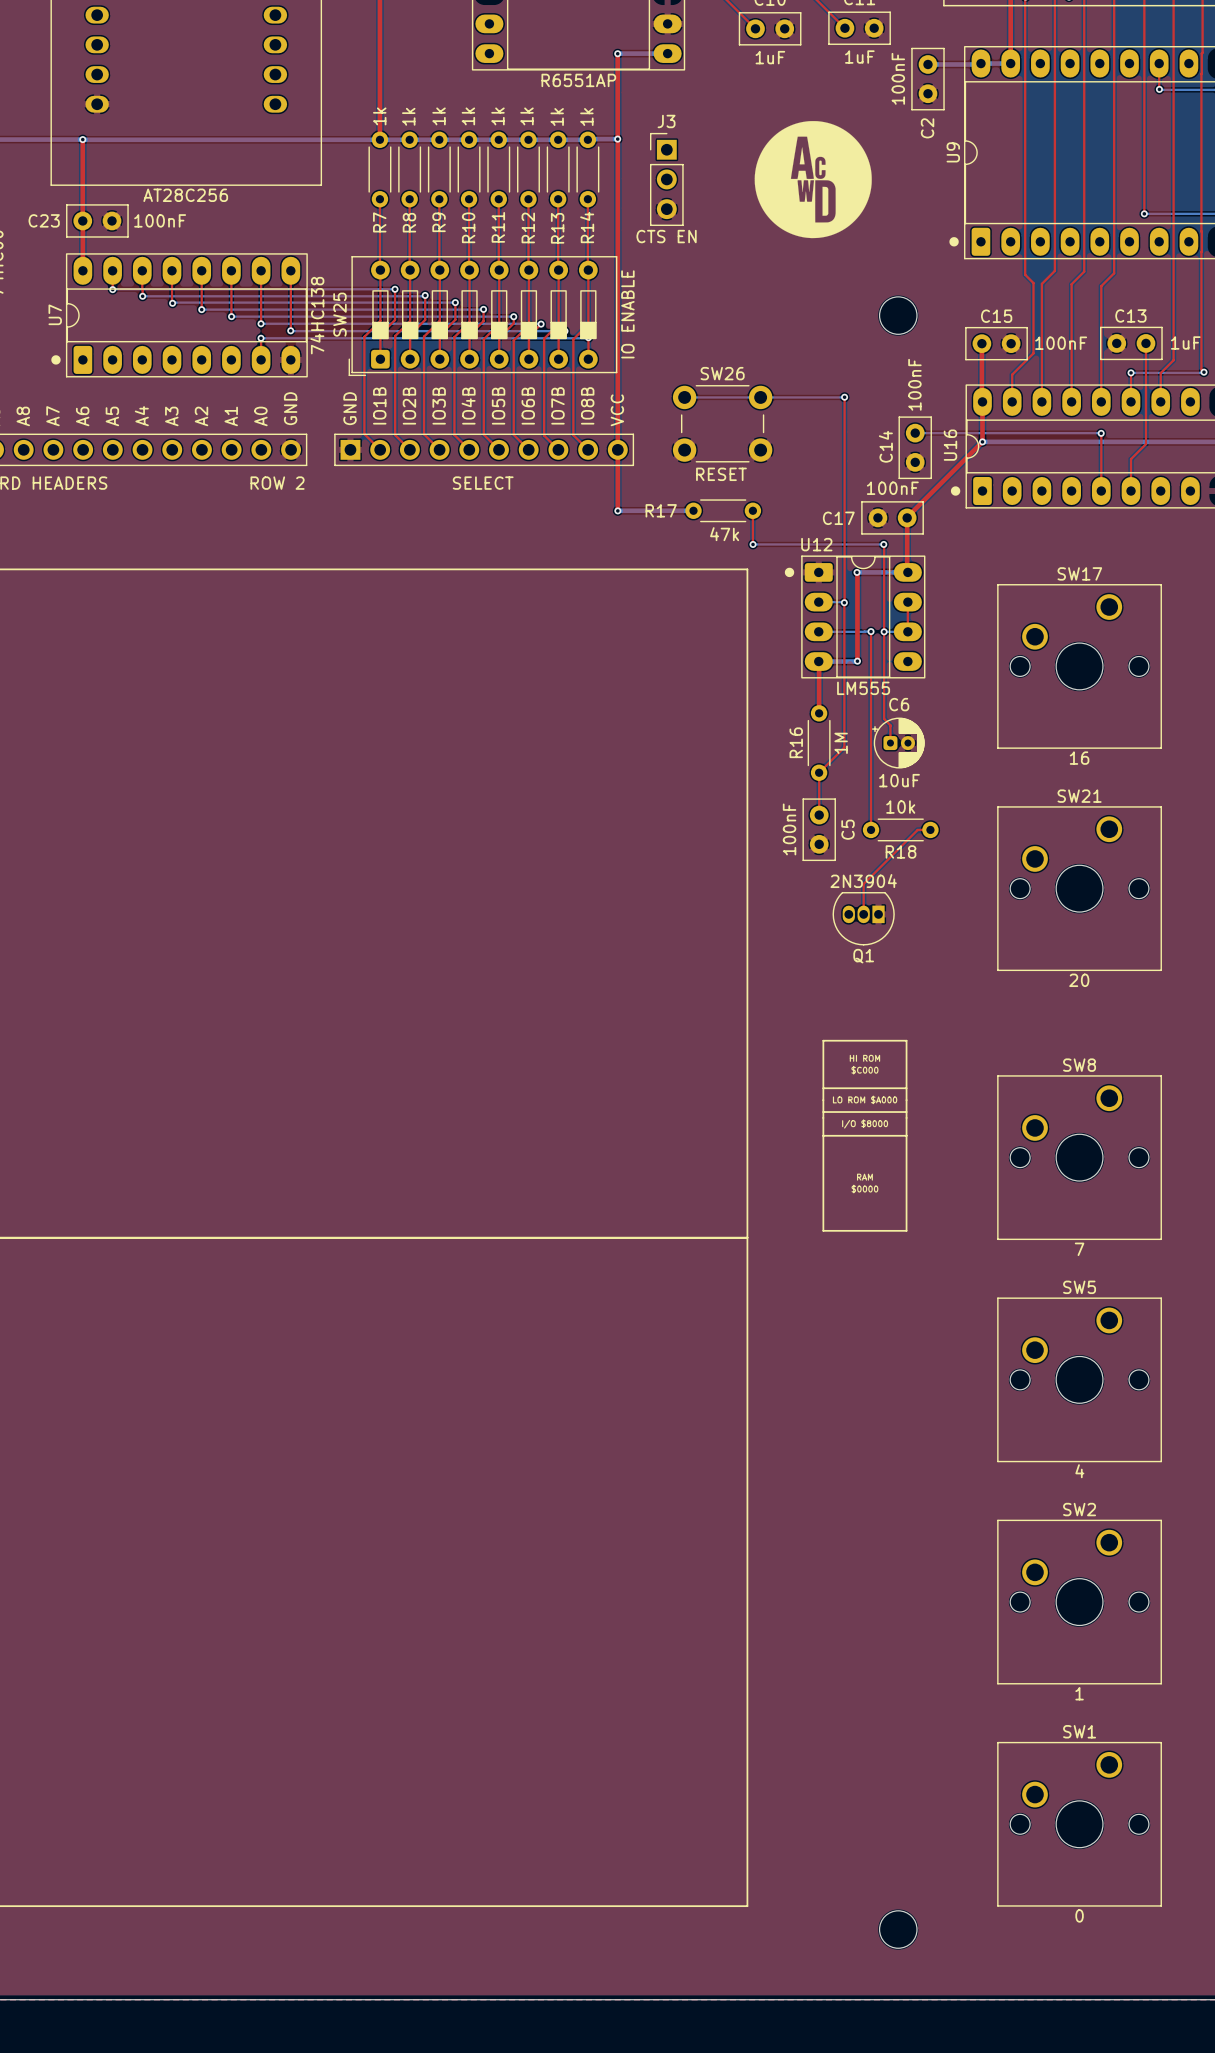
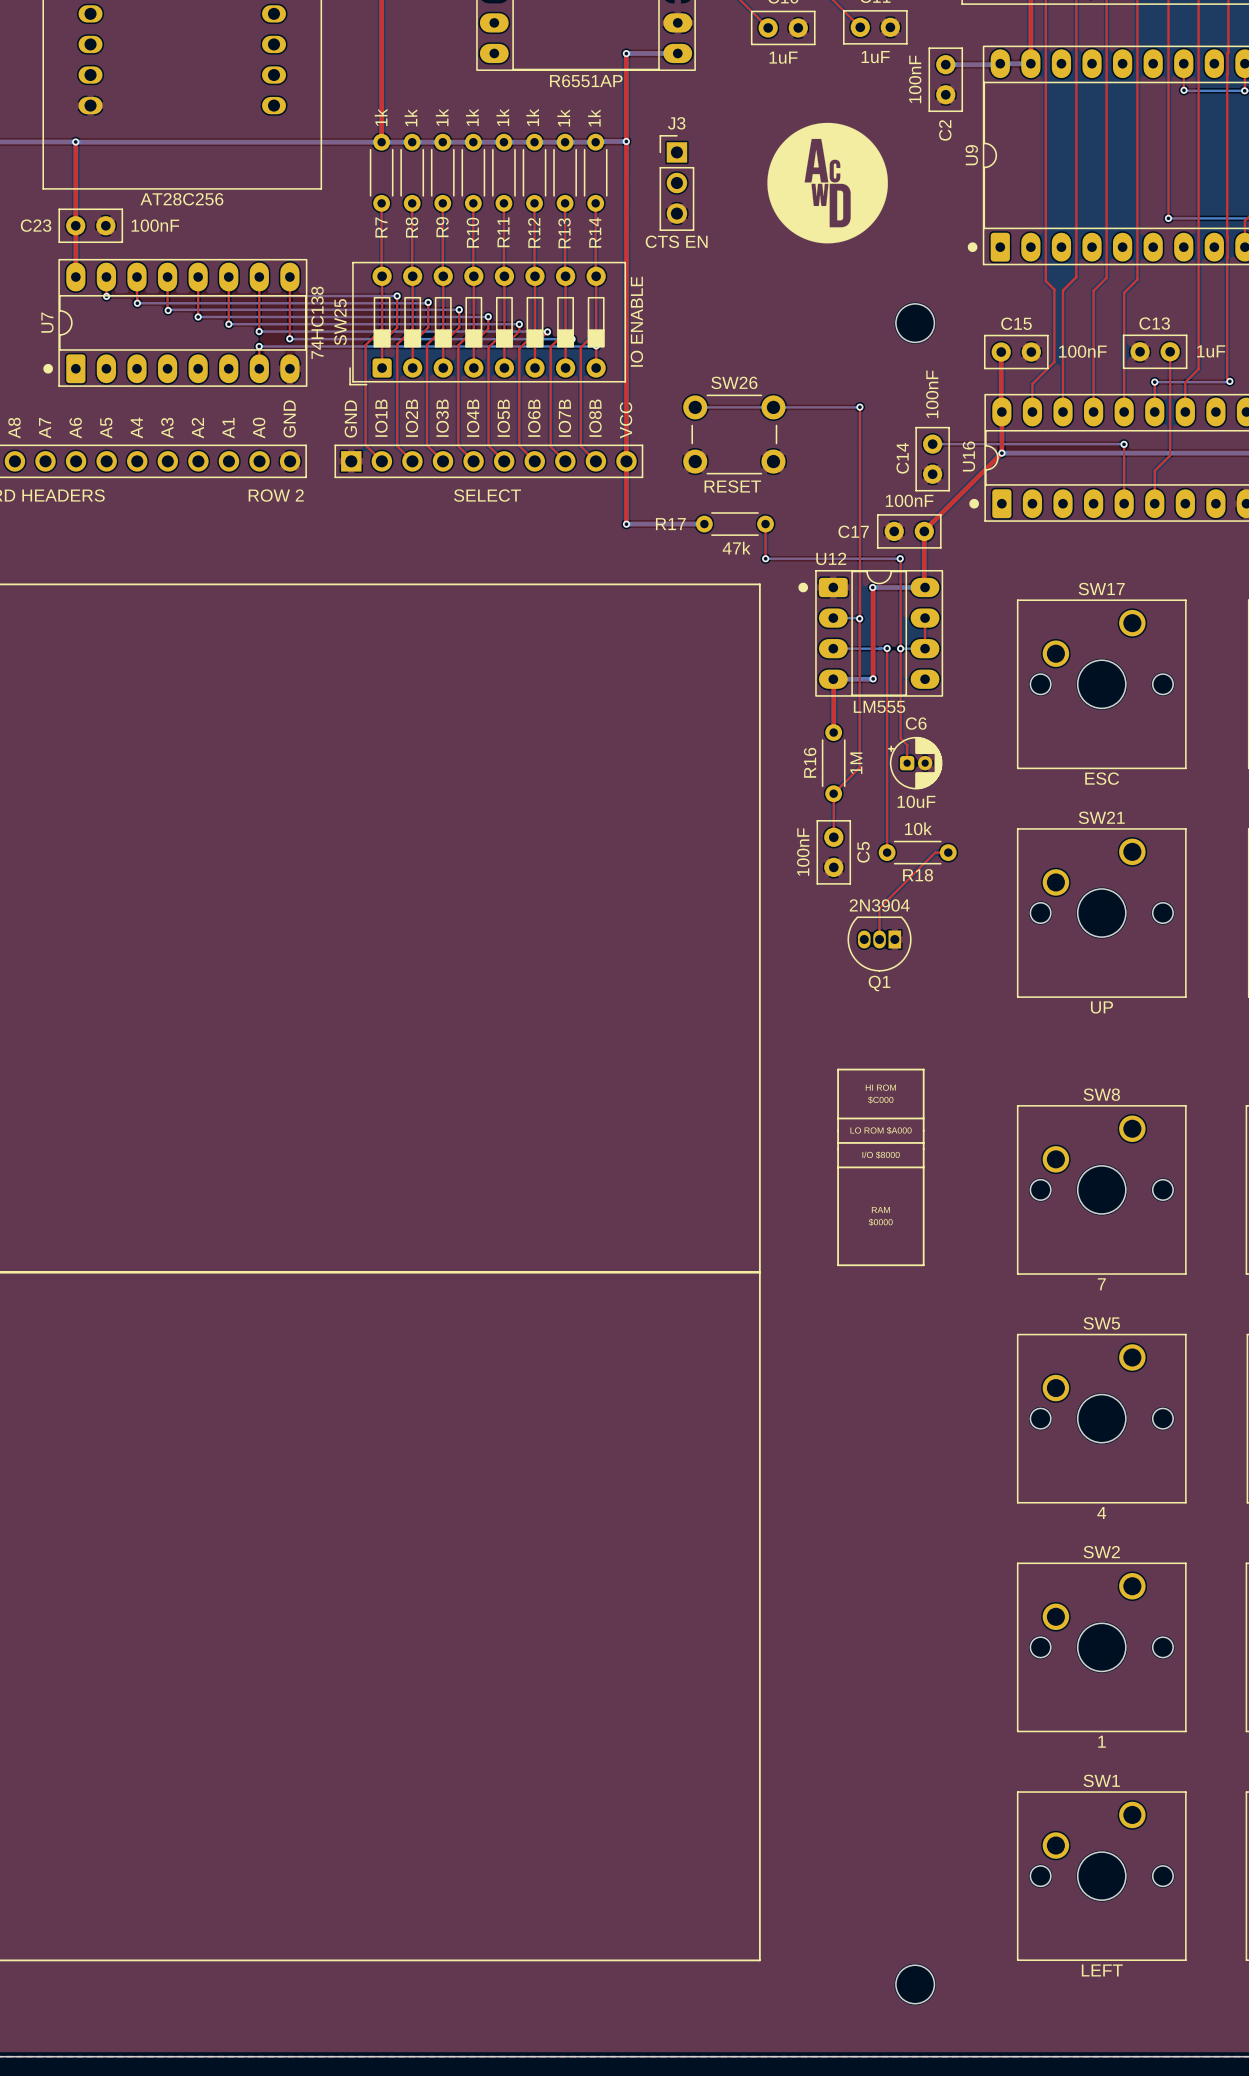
SW17 value: 16 (1079, 758) -> ESC (1102, 778)
SW21 value: 20 (1079, 980) -> UP (1101, 1007)
SW1 value: 0 (1079, 1915) -> LEFT (1102, 1970)

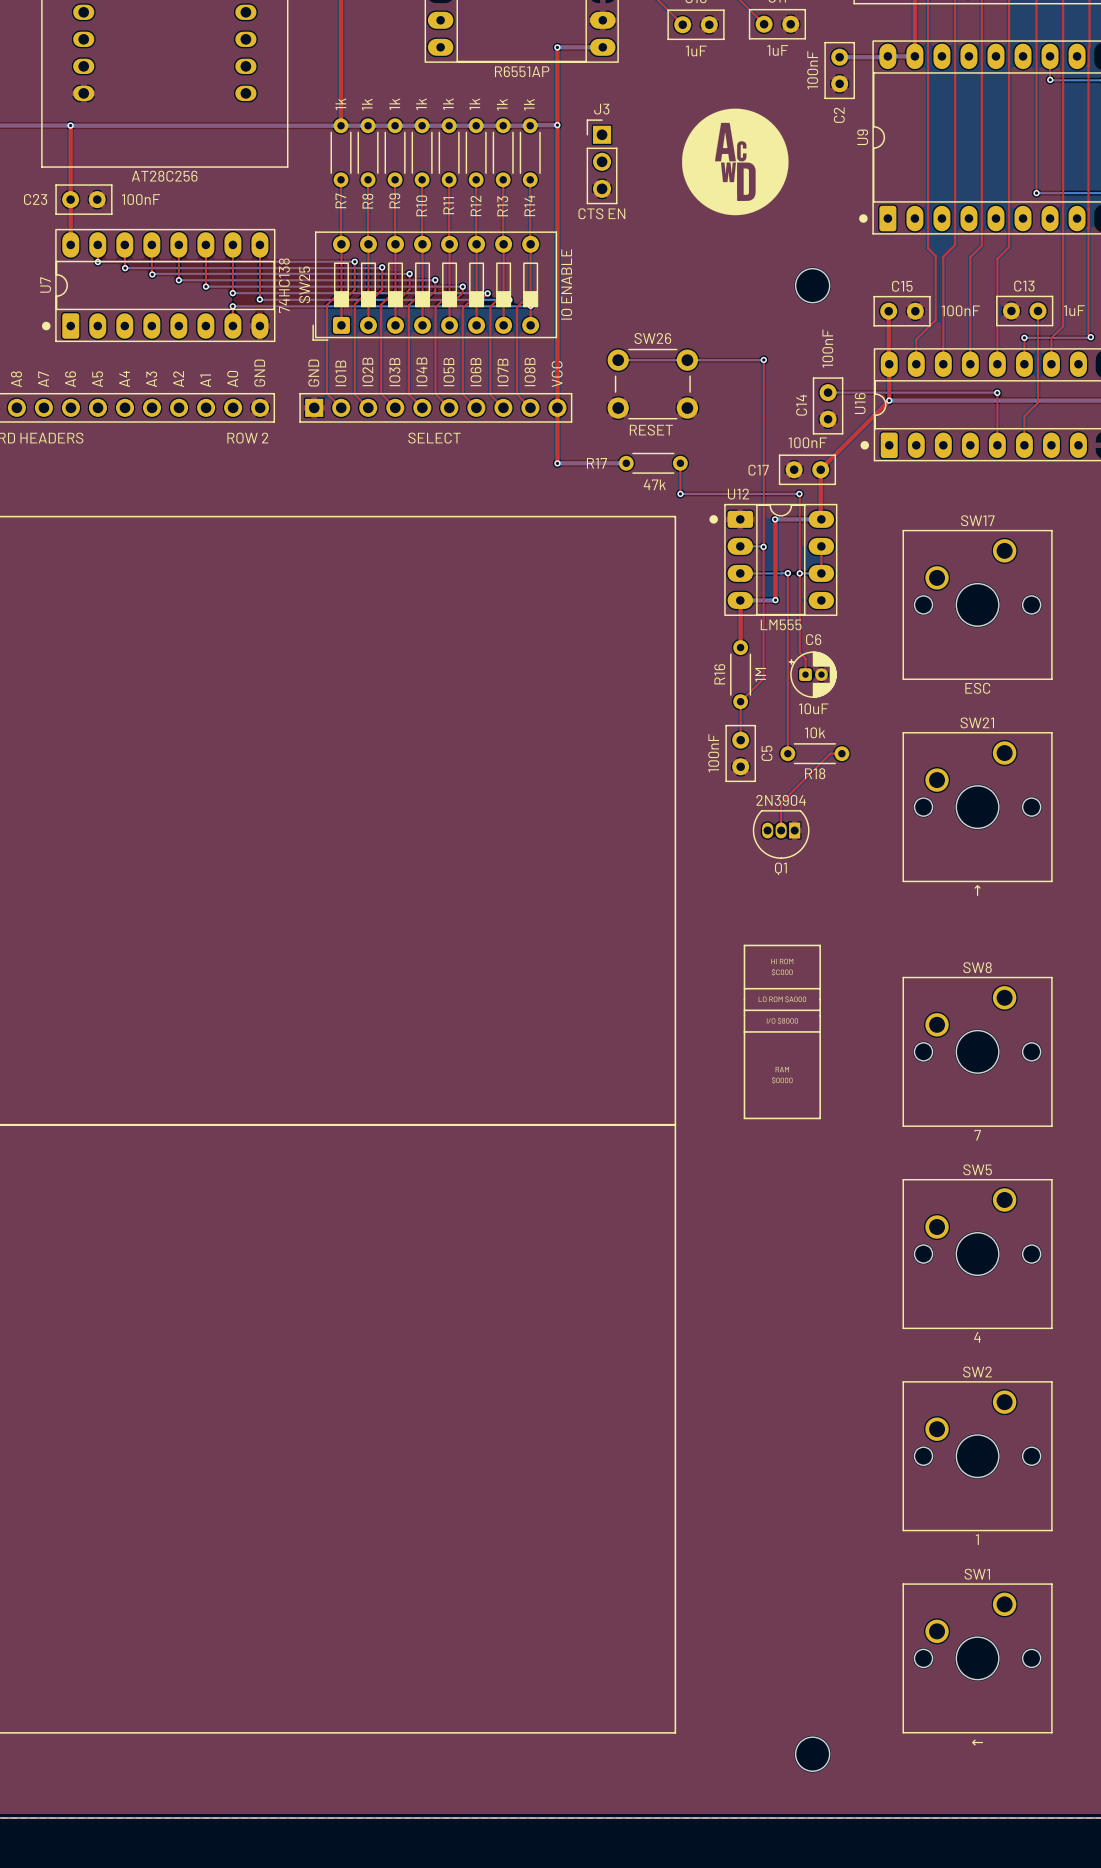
SW21 value: UP (1101, 1007) -> ↑ (977, 890)
SW1 value: LEFT (1102, 1970) -> ← (977, 1742)

